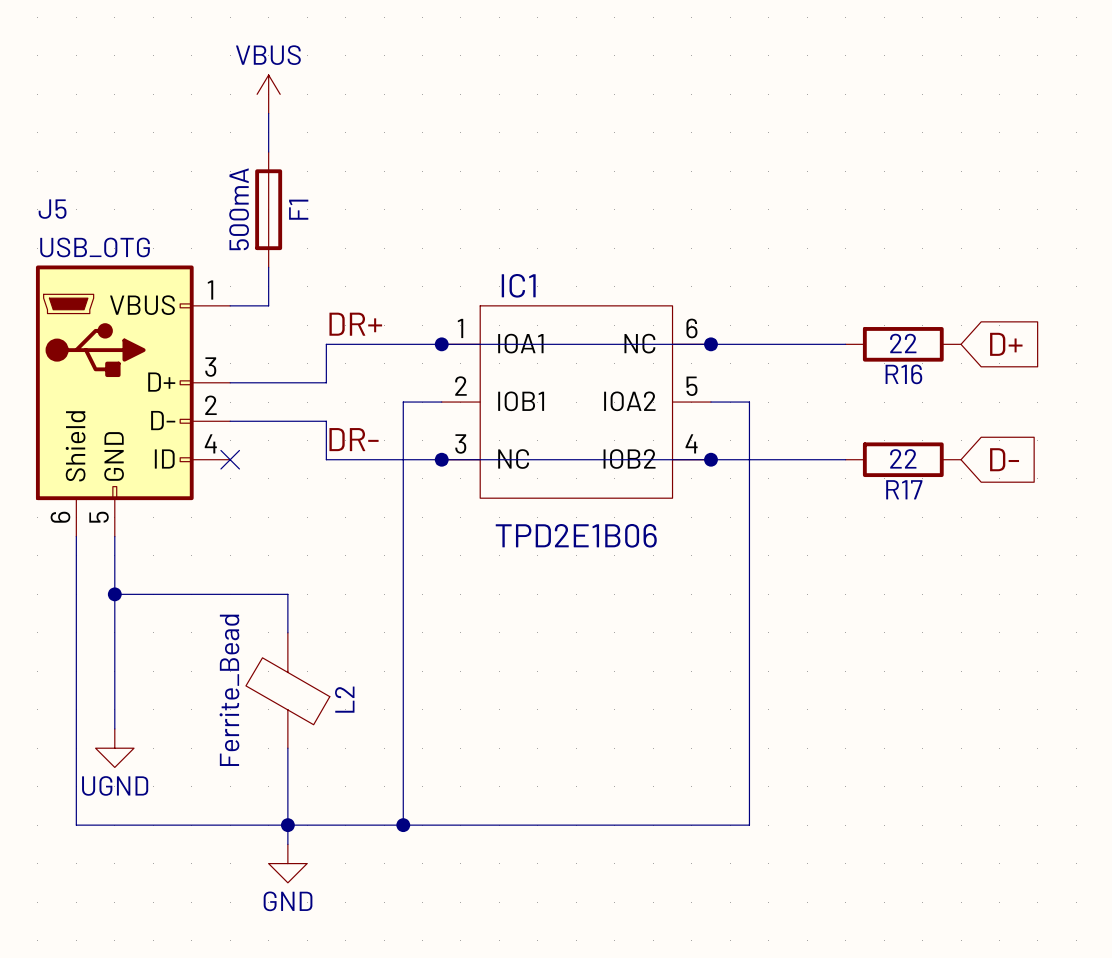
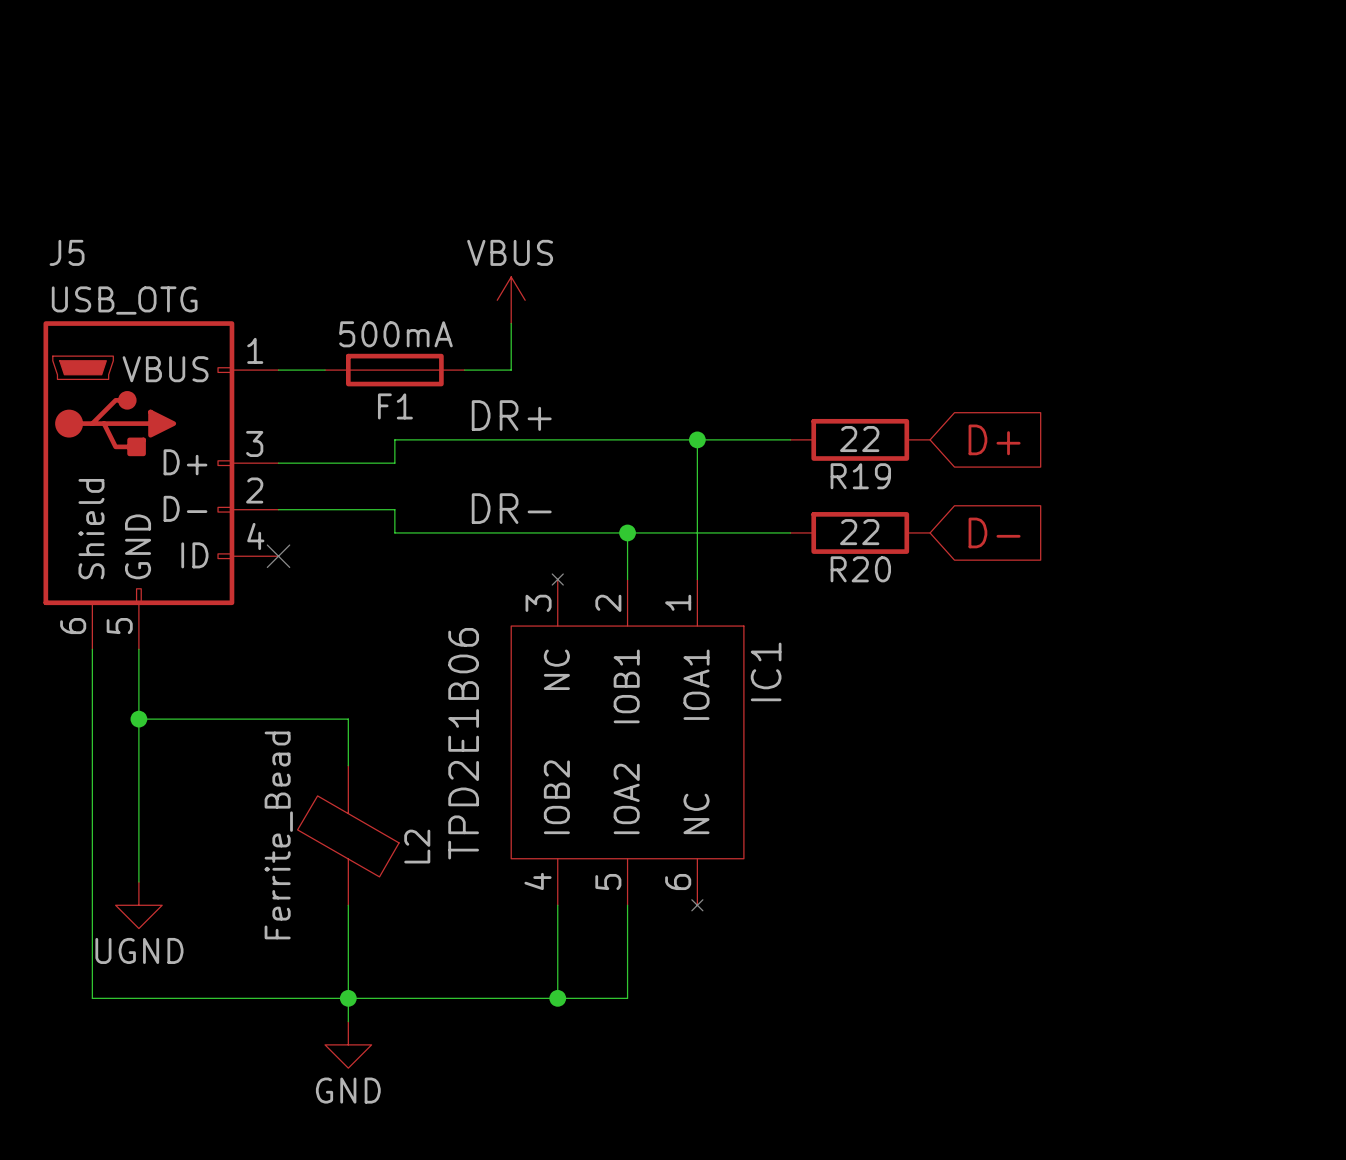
power symbol position: VBUS (268, 94) -> VBUS (511, 300)
wire: (268, 113) (268, 152) -> none
F1 rotation: 0° (268, 209) -> 90° clockwise (394, 370)
F1 position: (268, 209) -> (394, 370)
wire: (268, 267) (268, 305) -> (627, 532) (627, 579)
wire: none -> (511, 323) (511, 370) (464, 370)
label position: DR+ (355, 324) -> DR+ (511, 415)
junction: (441, 344) -> none
junction: (710, 344) -> none
wire: (845, 344) (326, 344) (326, 363) -> (790, 439) (394, 439)
R16: 22 (903, 344) -> none
global label position: D+ (1006, 344) -> D+ (994, 439)
wire: none -> (697, 439) (697, 579)
junction: none -> (697, 439)
R19: none -> 22 (860, 439)
wire: (441, 402) (403, 402) (403, 825) -> none
IC1 rotation: 0° (576, 402) -> 90° clockwise (627, 742)
IC1 position: (576, 402) -> (627, 742)
wire: (710, 402) (749, 402) (749, 825) (518, 825) -> (627, 905) (627, 998)
label position: DR- (354, 439) -> DR- (511, 508)
wire: (326, 440) (326, 459) (845, 459) -> (394, 532) (790, 532)
junction: none -> (627, 532)
R20: none -> 22 (860, 532)
junction: (441, 459) -> none
junction: (710, 459) -> none
R17: 22 (903, 459) -> none
global label position: D- (1004, 459) -> D- (994, 532)
wire: none -> (557, 905) (557, 998)
junction position: (403, 825) -> (557, 998)

